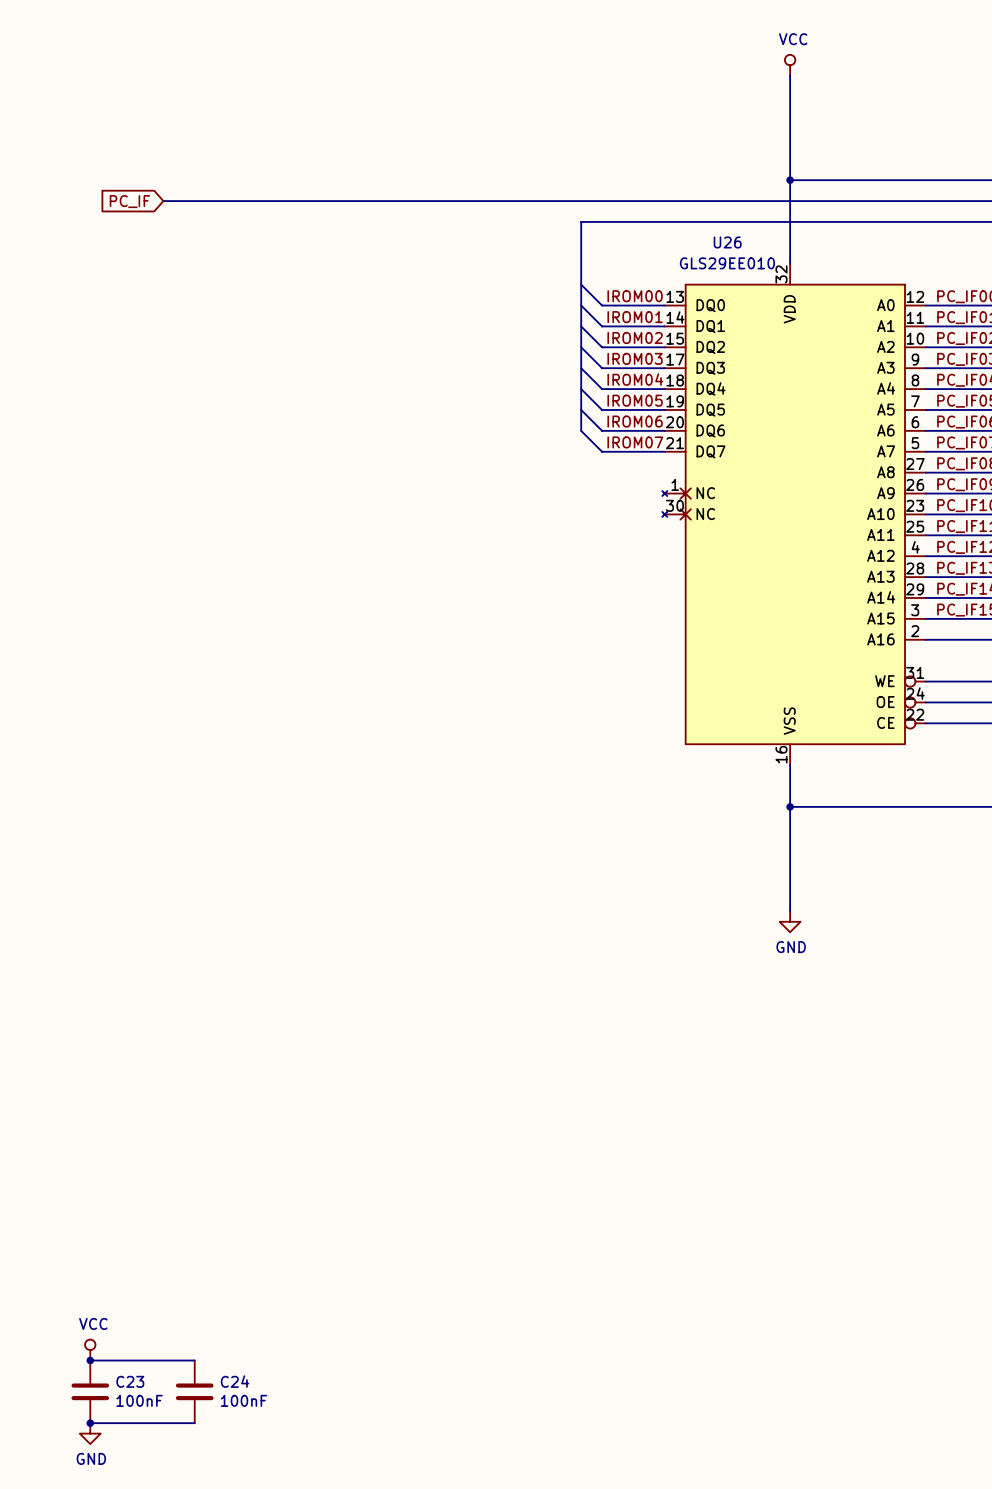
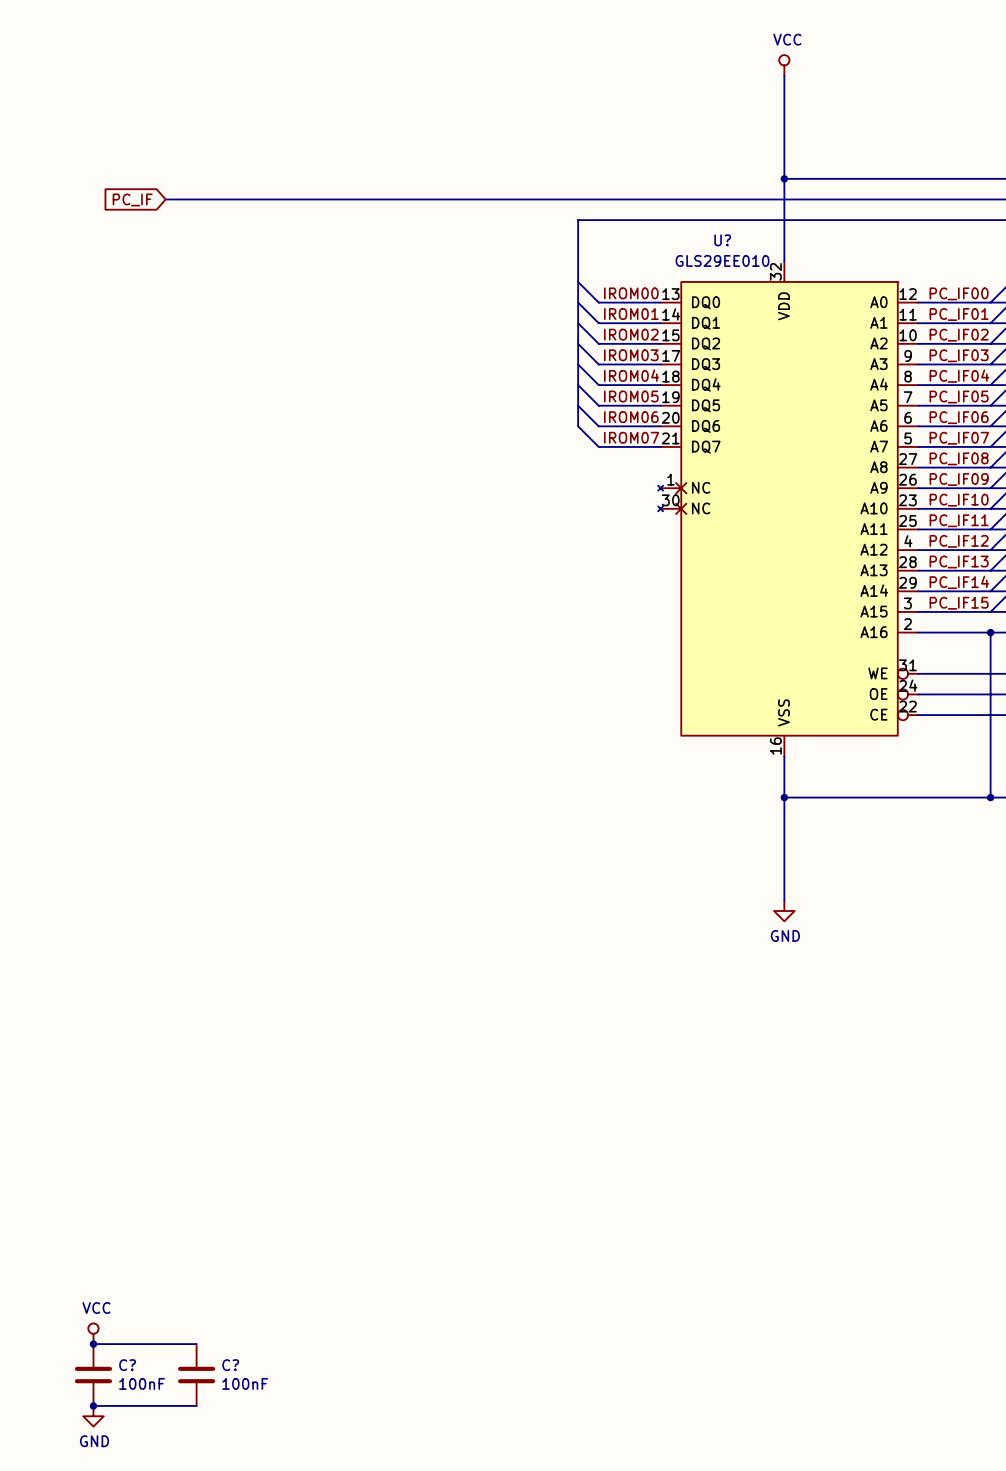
U26 name: U26 (727, 242) -> U? (722, 240)
C23 name: C23 (130, 1381) -> C? (127, 1365)
C24 name: C24 (234, 1381) -> C? (230, 1365)

